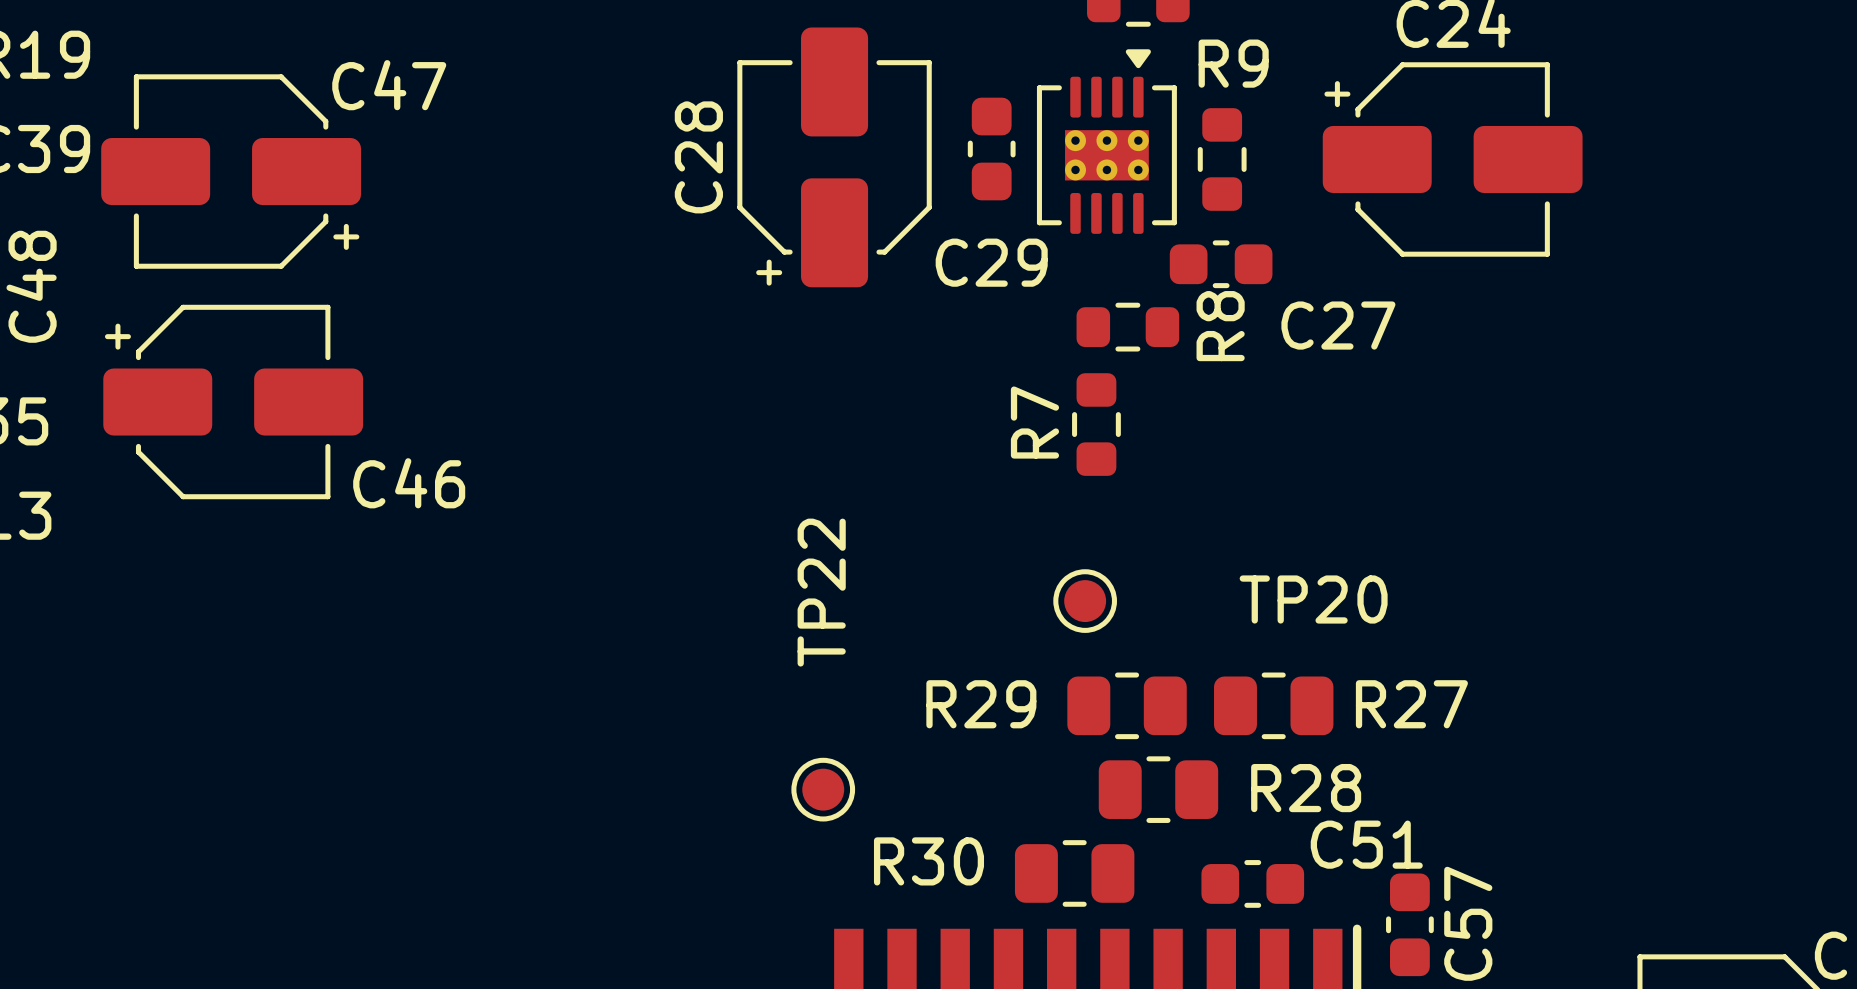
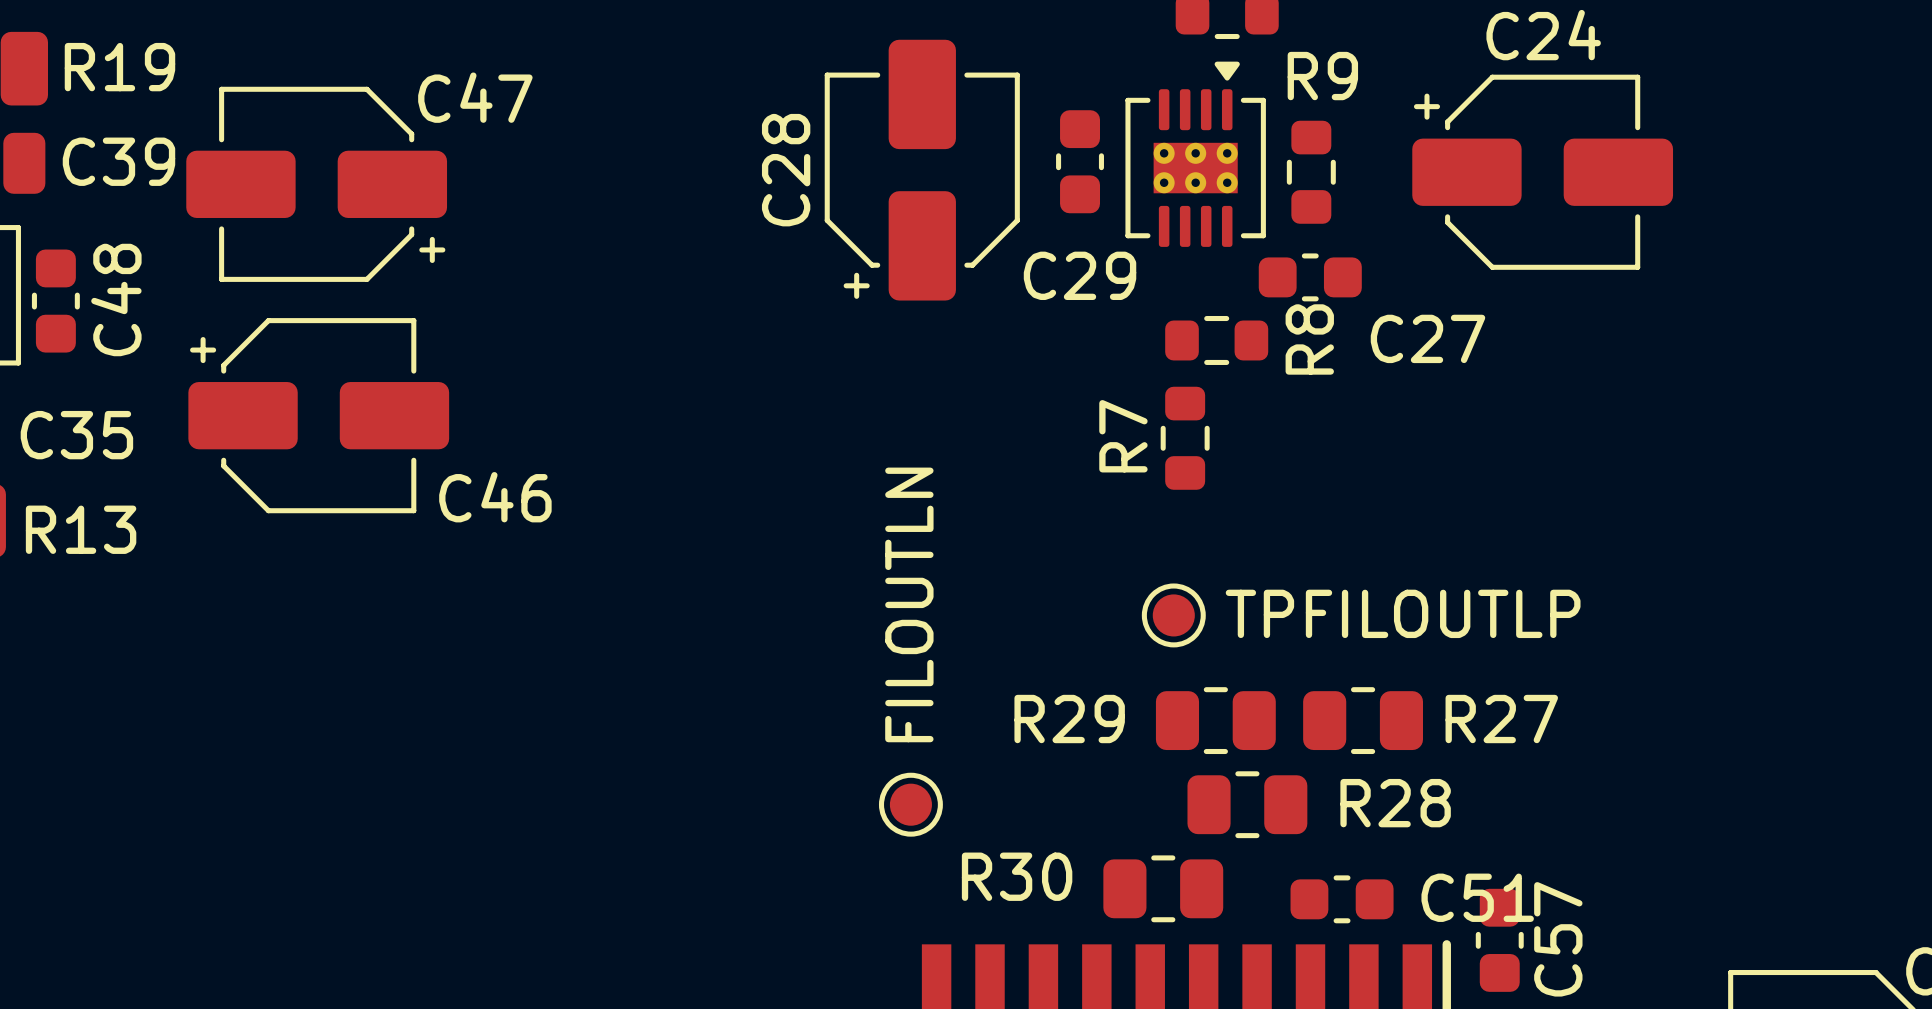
TP22 name: TP22 (821, 592) -> FILOUTLN (909, 604)
TP20 name: TP20 (1313, 599) -> TPFILOUTLP (1403, 613)
C51 name position: C51 (1366, 844) -> C51 (1477, 897)

